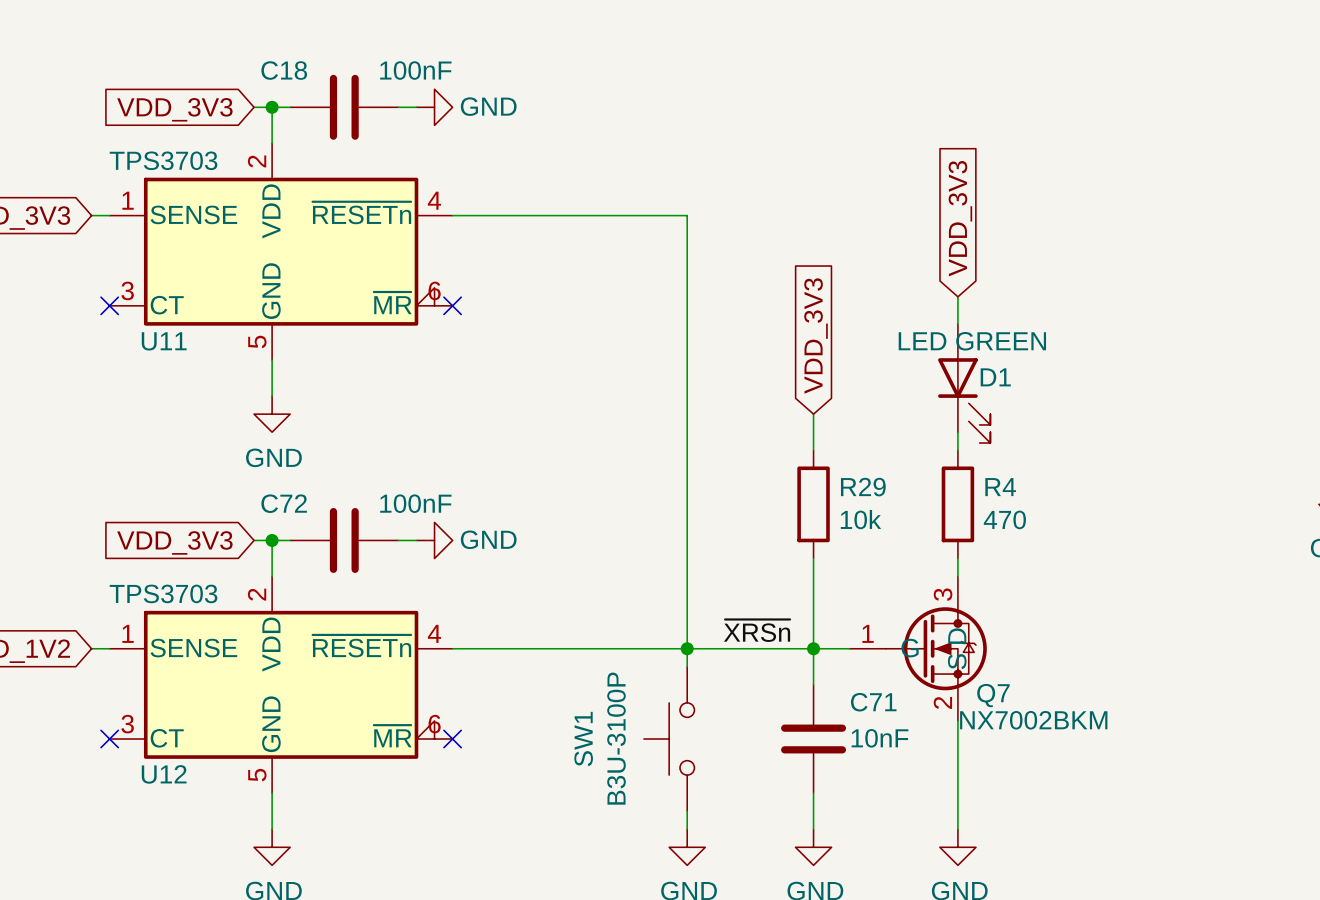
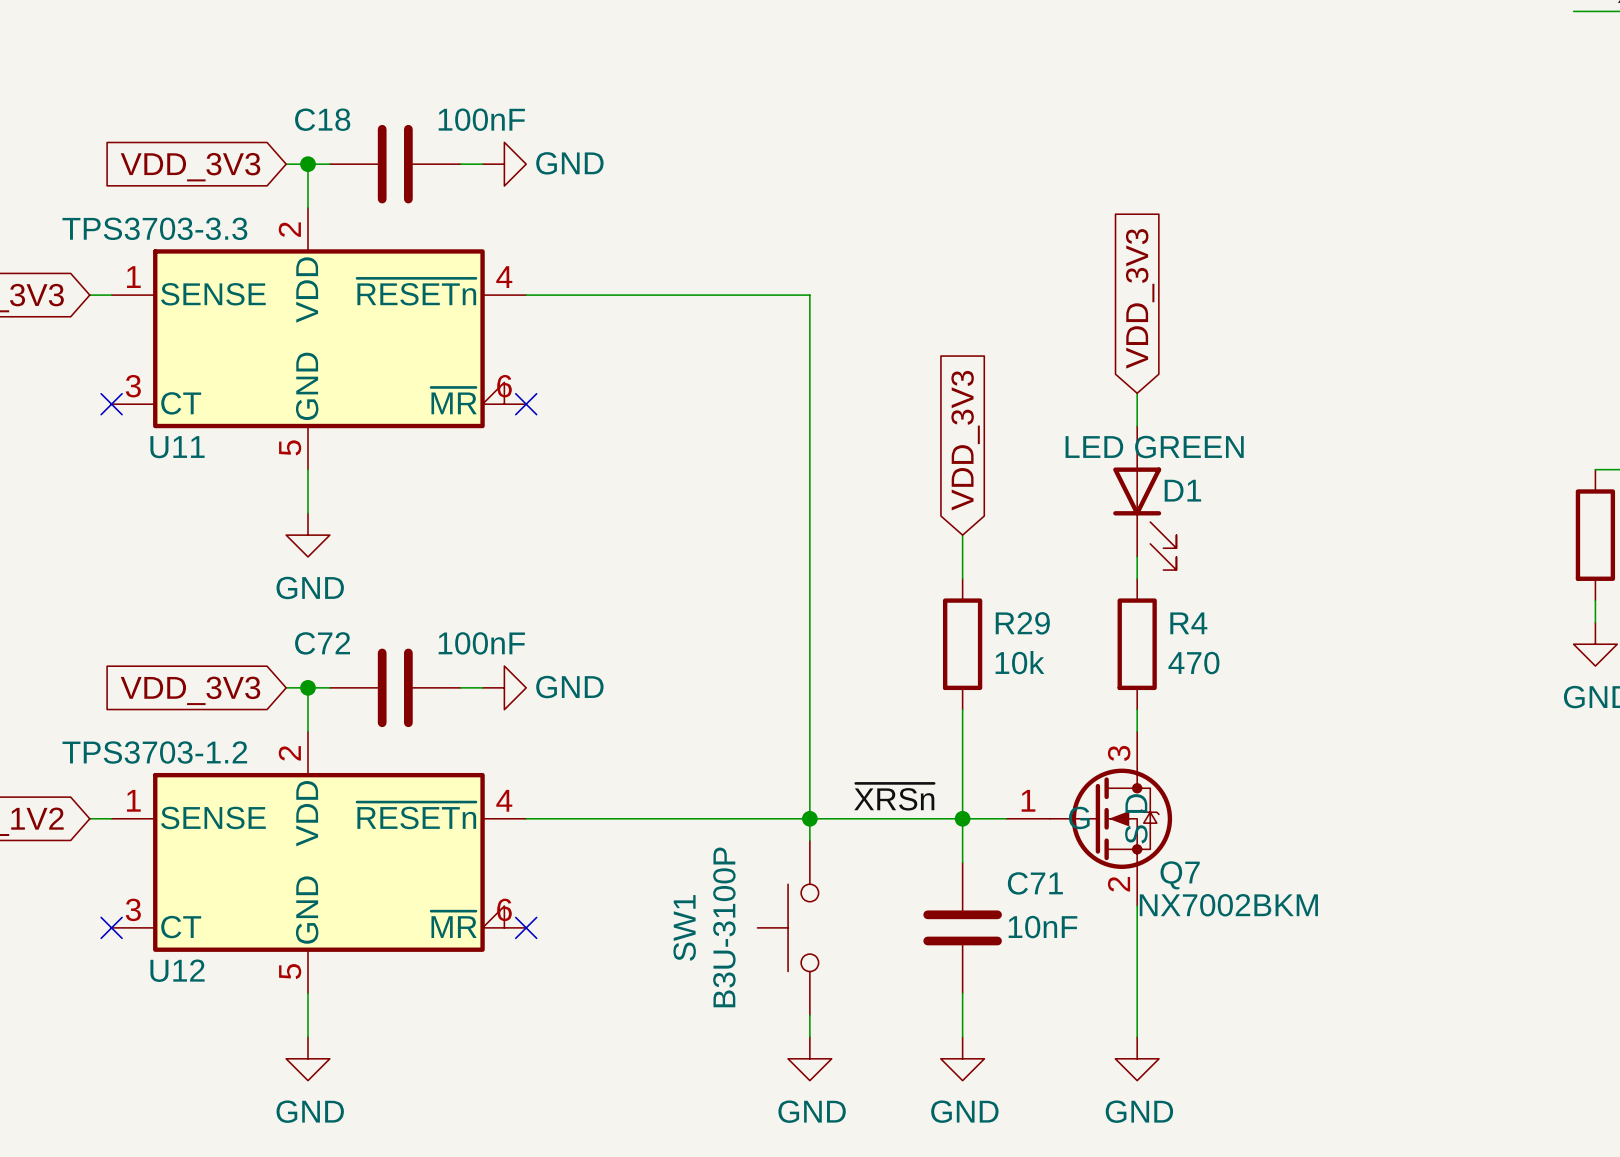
U11 value: TPS3703 (163, 160) -> TPS3703-3.3 (154, 228)
U12 value: TPS3703 (163, 593) -> TPS3703-1.2 (154, 752)

